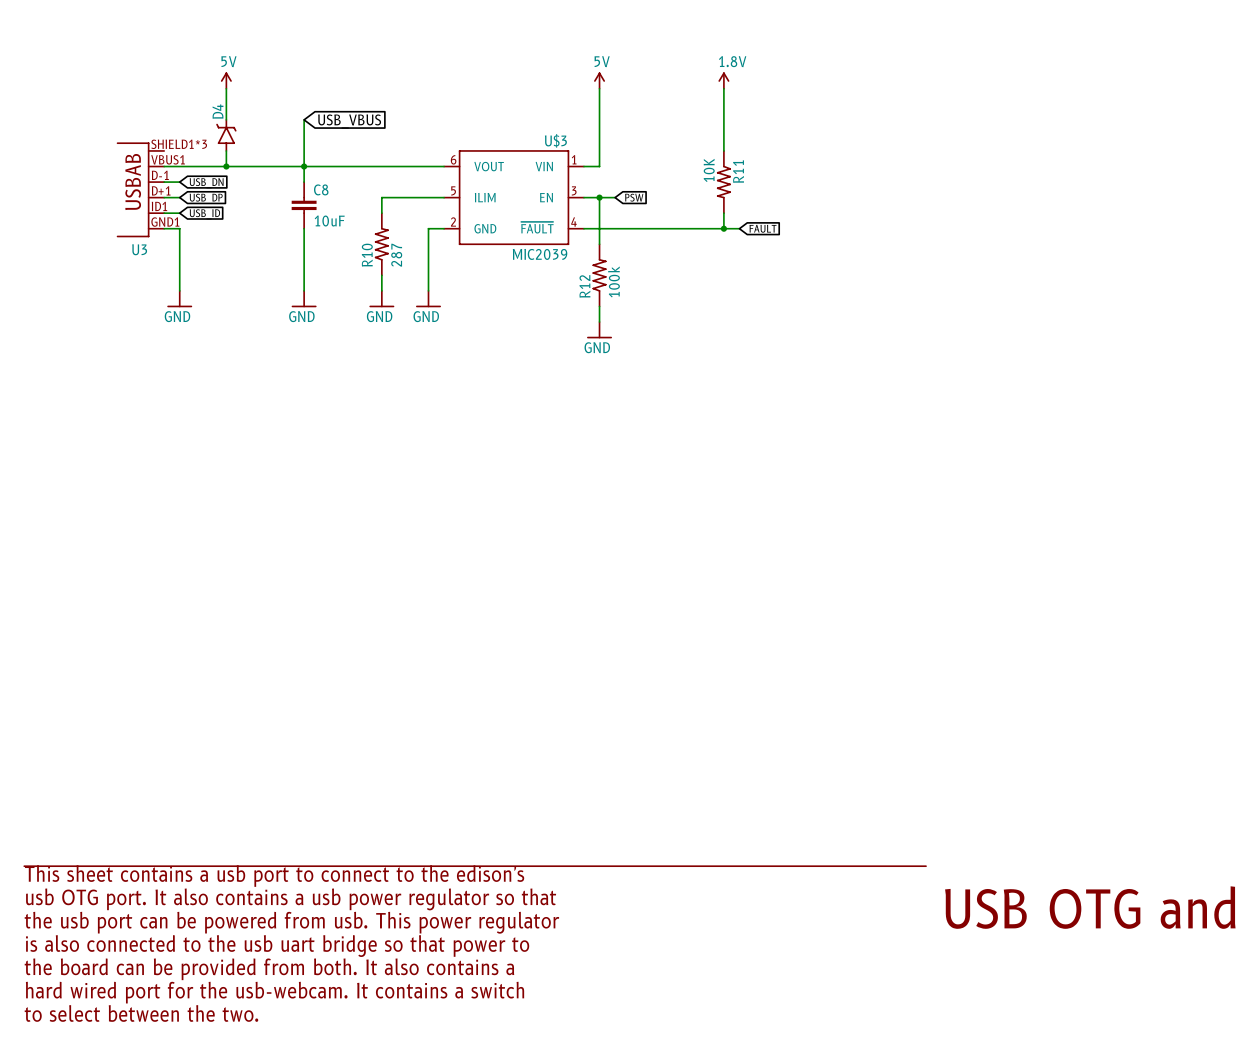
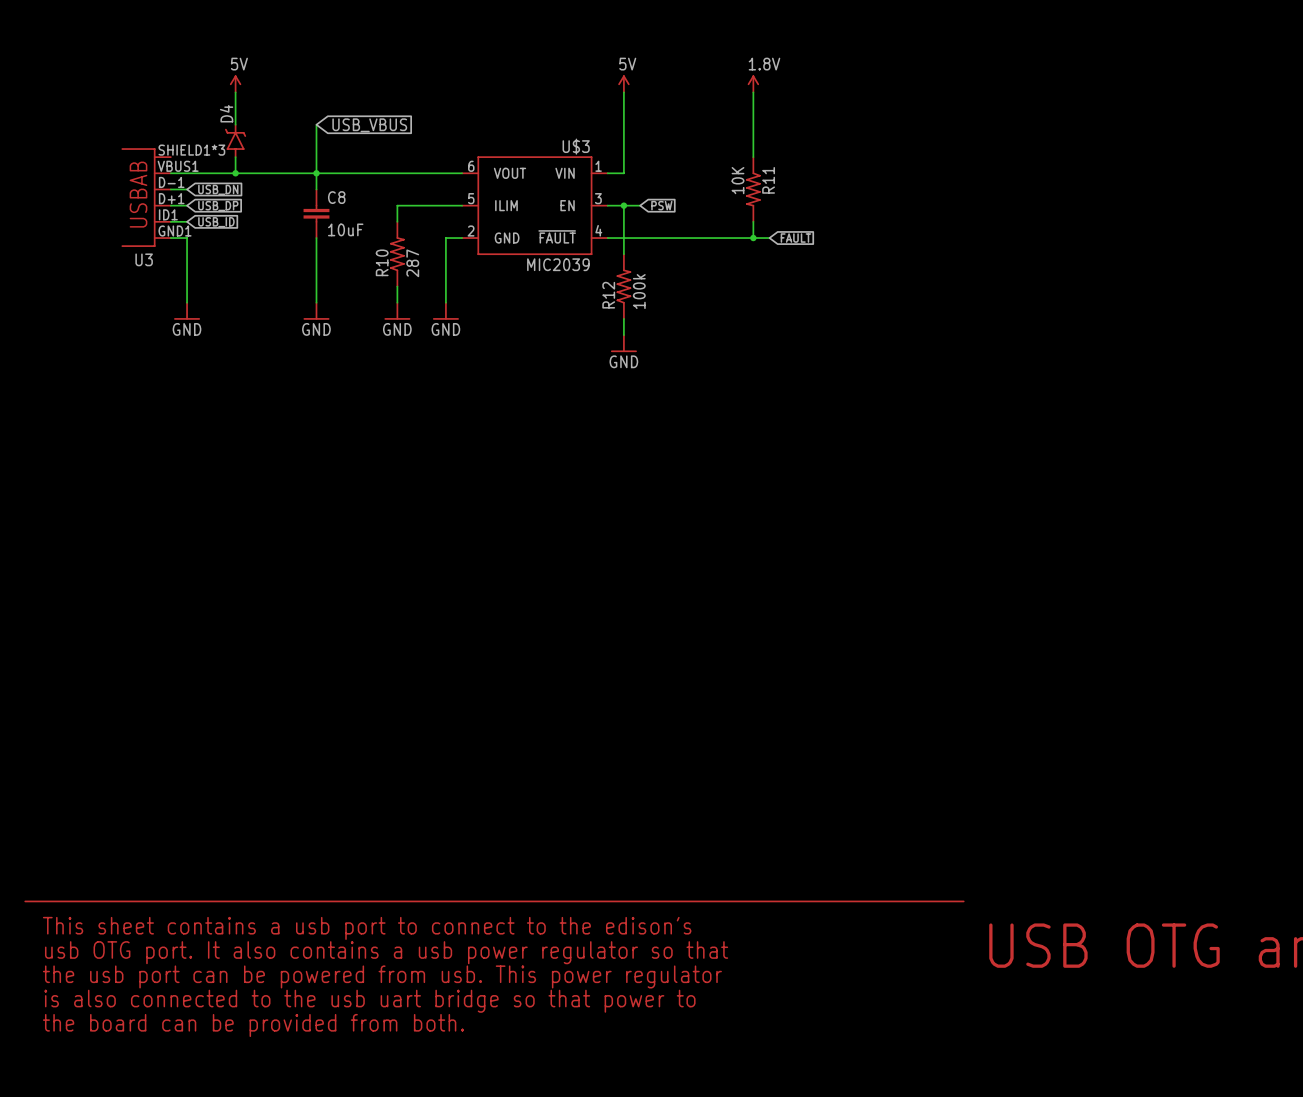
text position: This sheet contains a usb port to connect to the edison's (274, 876) -> This sheet contains a usb port to connect to the edison's (367, 928)
text position: usb OTG port. It also contains a usb power regulator so that (291, 899) -> usb OTG port. It also contains a usb power regulator so that (386, 952)
text position: the usb port can be powered from usb. This power regulator (291, 922) -> the usb port can be powered from usb. This power regulator (382, 976)
text position: is also connected to the usb uart bridge so that power to (277, 946) -> is also connected to the usb uart bridge so that power to (369, 1001)
text: the board can be provided from both. It also contains a (269, 969) -> the board can be provided from both. (253, 1025)
text: hard wired port for the usb-webcam. It contains a switch (275, 992) -> none
text: to select between the two. (141, 1013) -> none

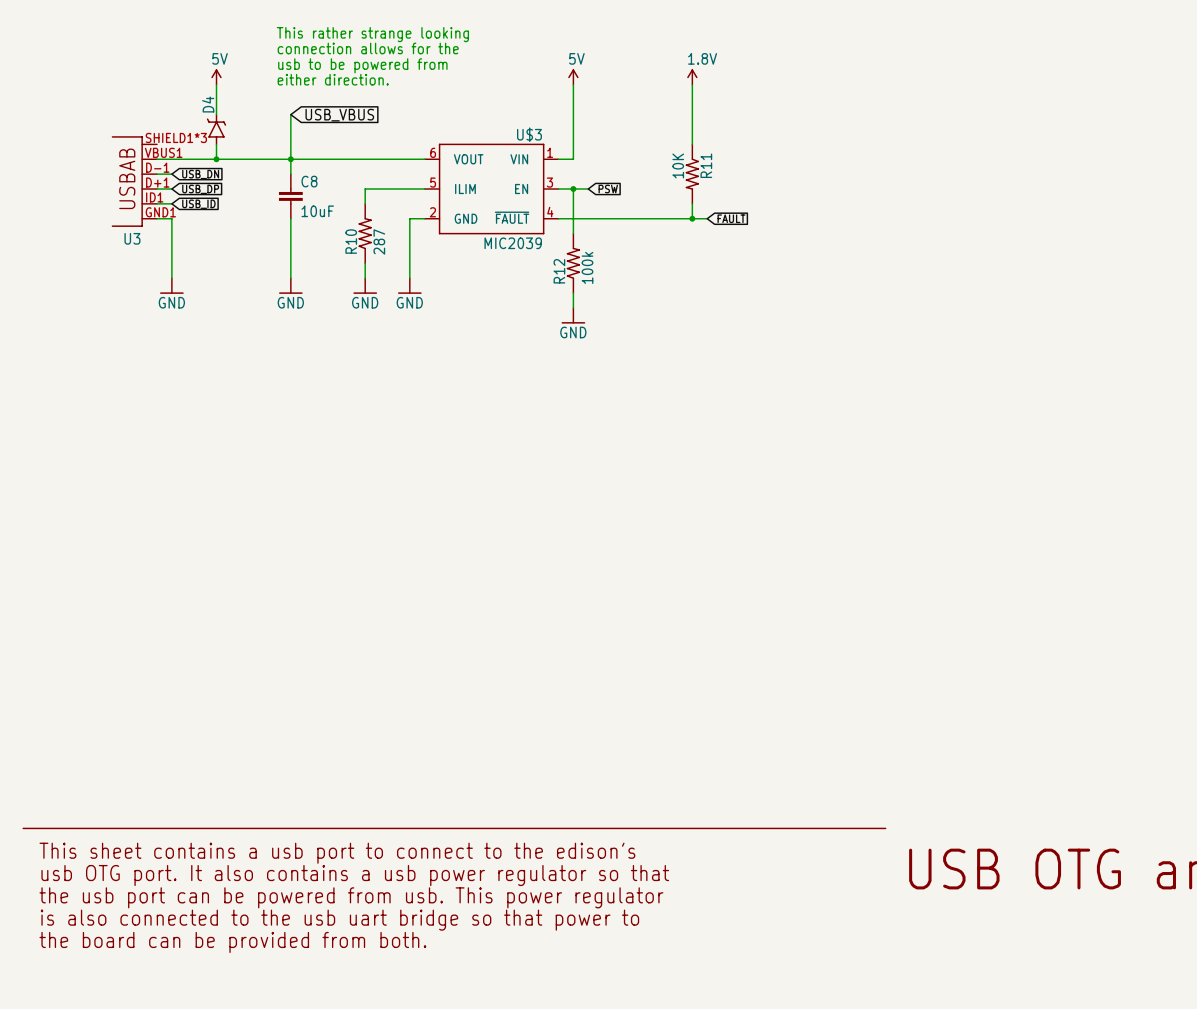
text: none -> This rather strange looking (372, 34)
text: none -> connection allows for the (368, 48)
text: none -> usb to be powered from (362, 65)
text: none -> either direction. (333, 79)

